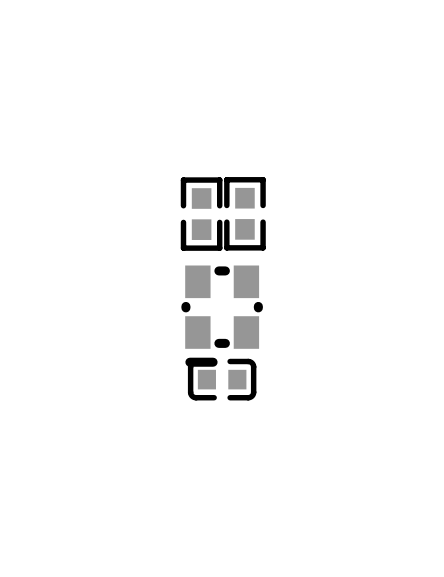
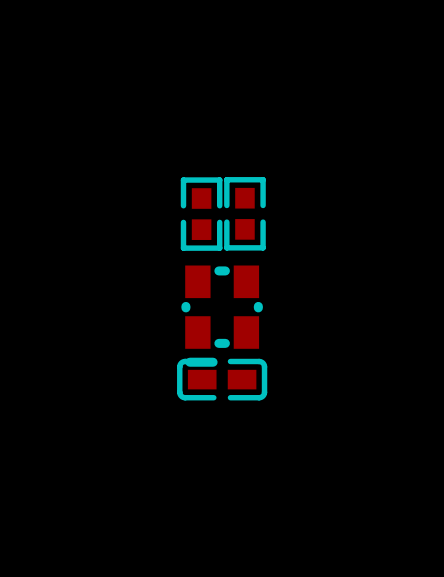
part footprint: [187, 358, 257, 401] -> [177, 358, 268, 401]

